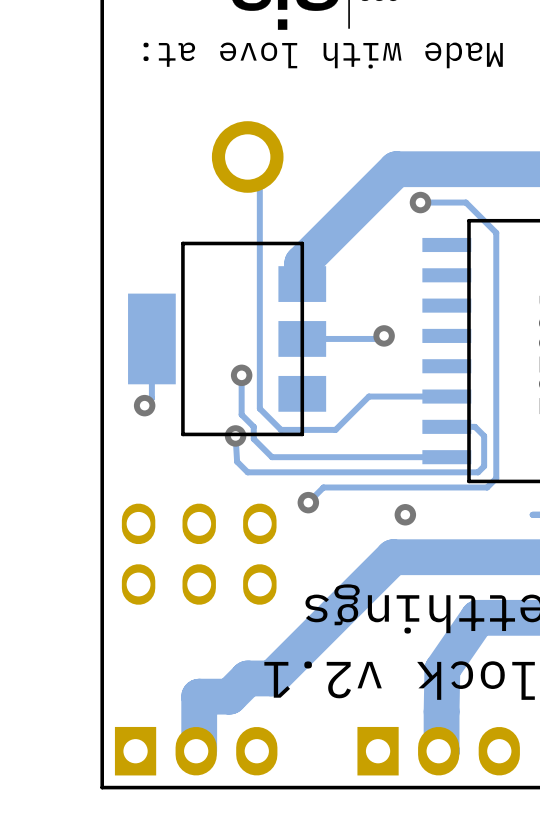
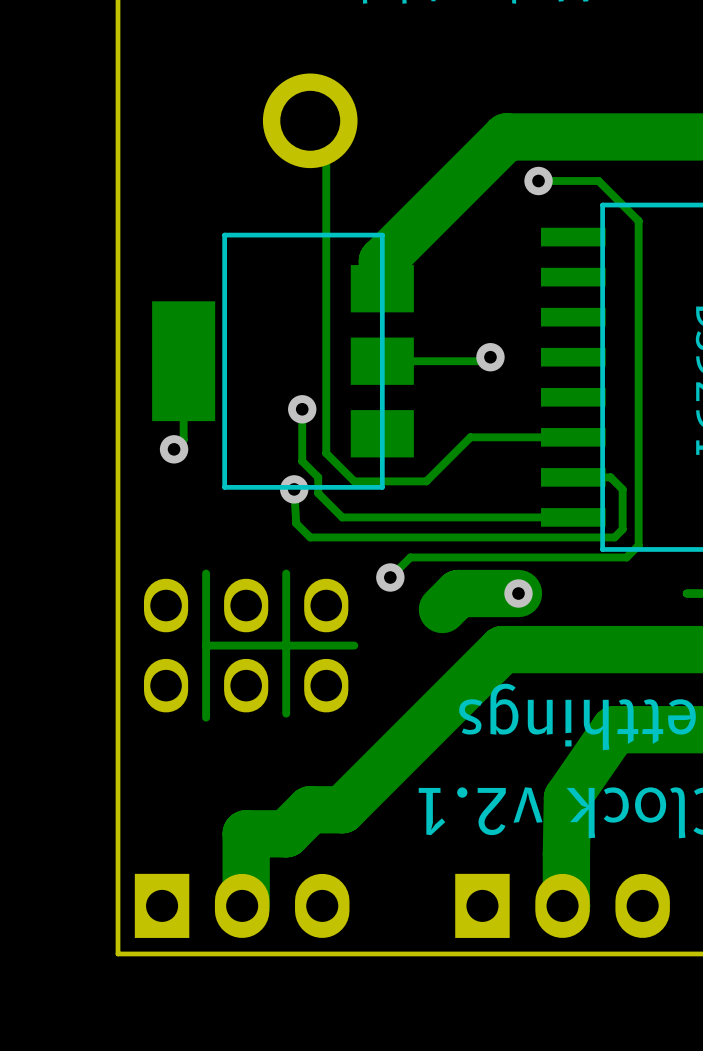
track: none -> (206, 573) (206, 717)
track: none -> (286, 573) (286, 713)
track: none -> (518, 593) (458, 593) (442, 609)
track: none -> (354, 645) (206, 645)

